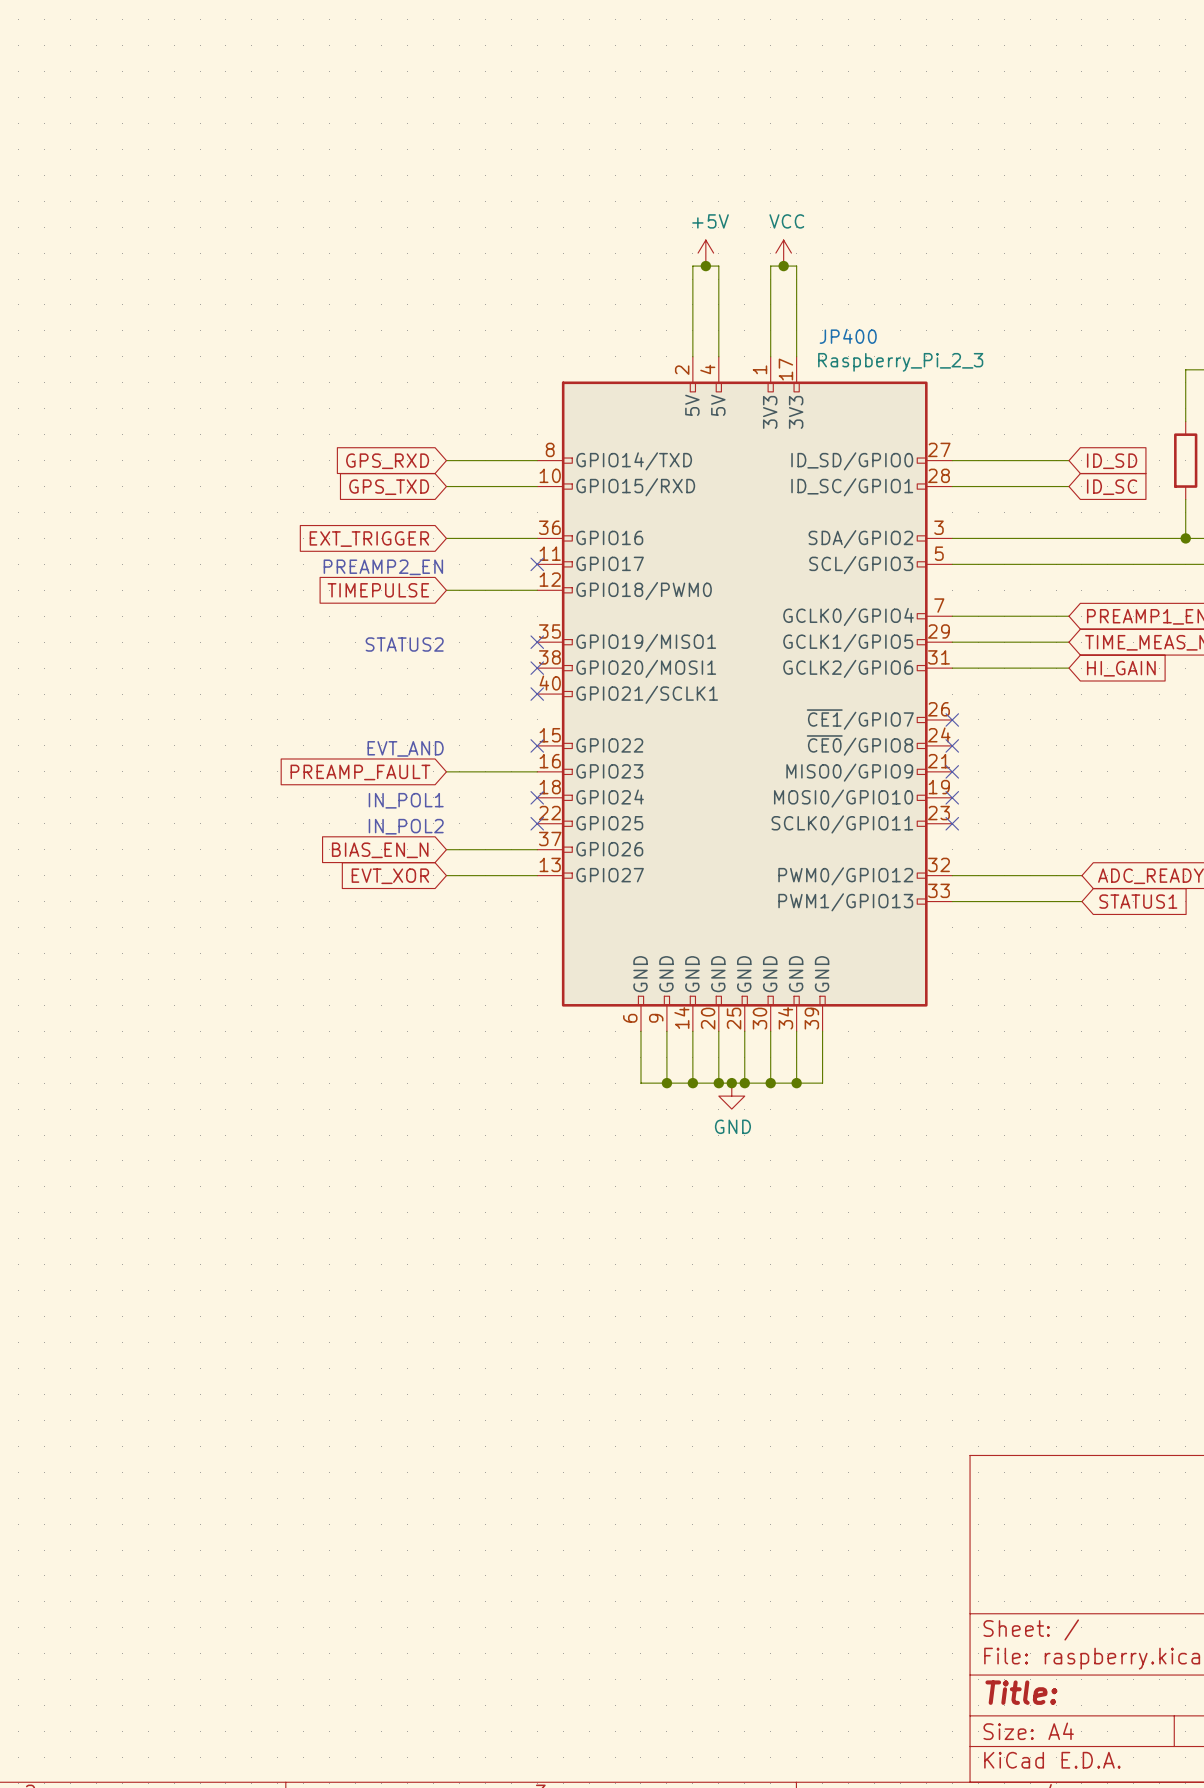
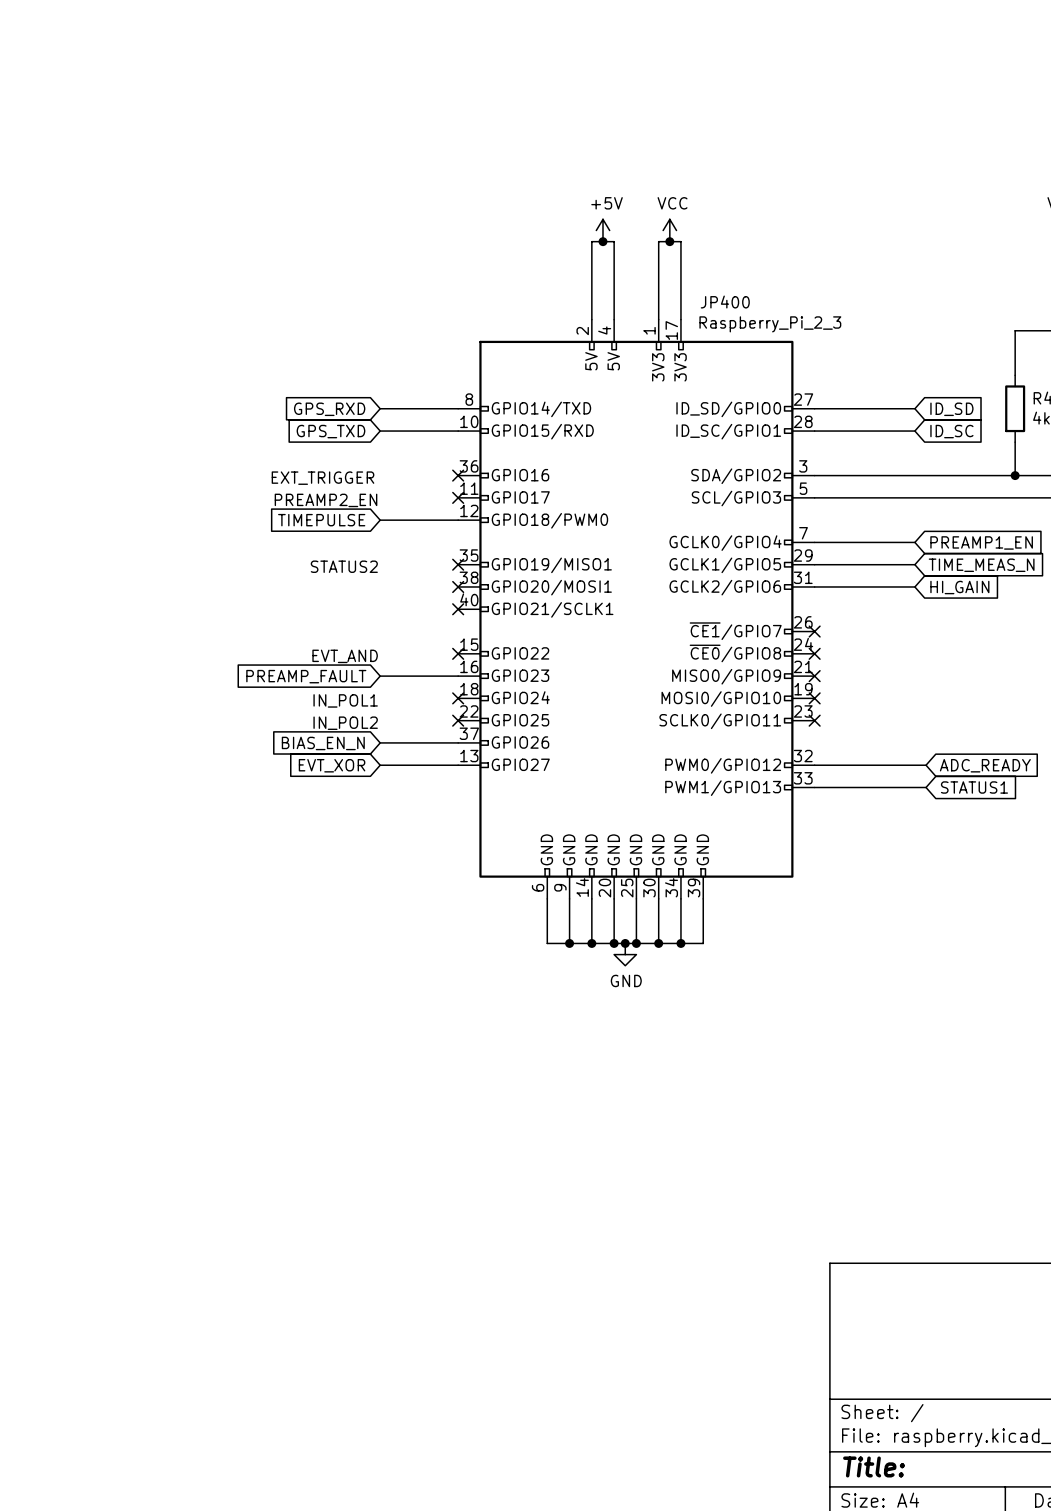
wire: (446, 538) (537, 538) -> none
no-connect mark: none -> (458, 475)
global label: EXT_TRIGGER (369, 539) -> none
text: none -> EXT_TRIGGER (322, 478)

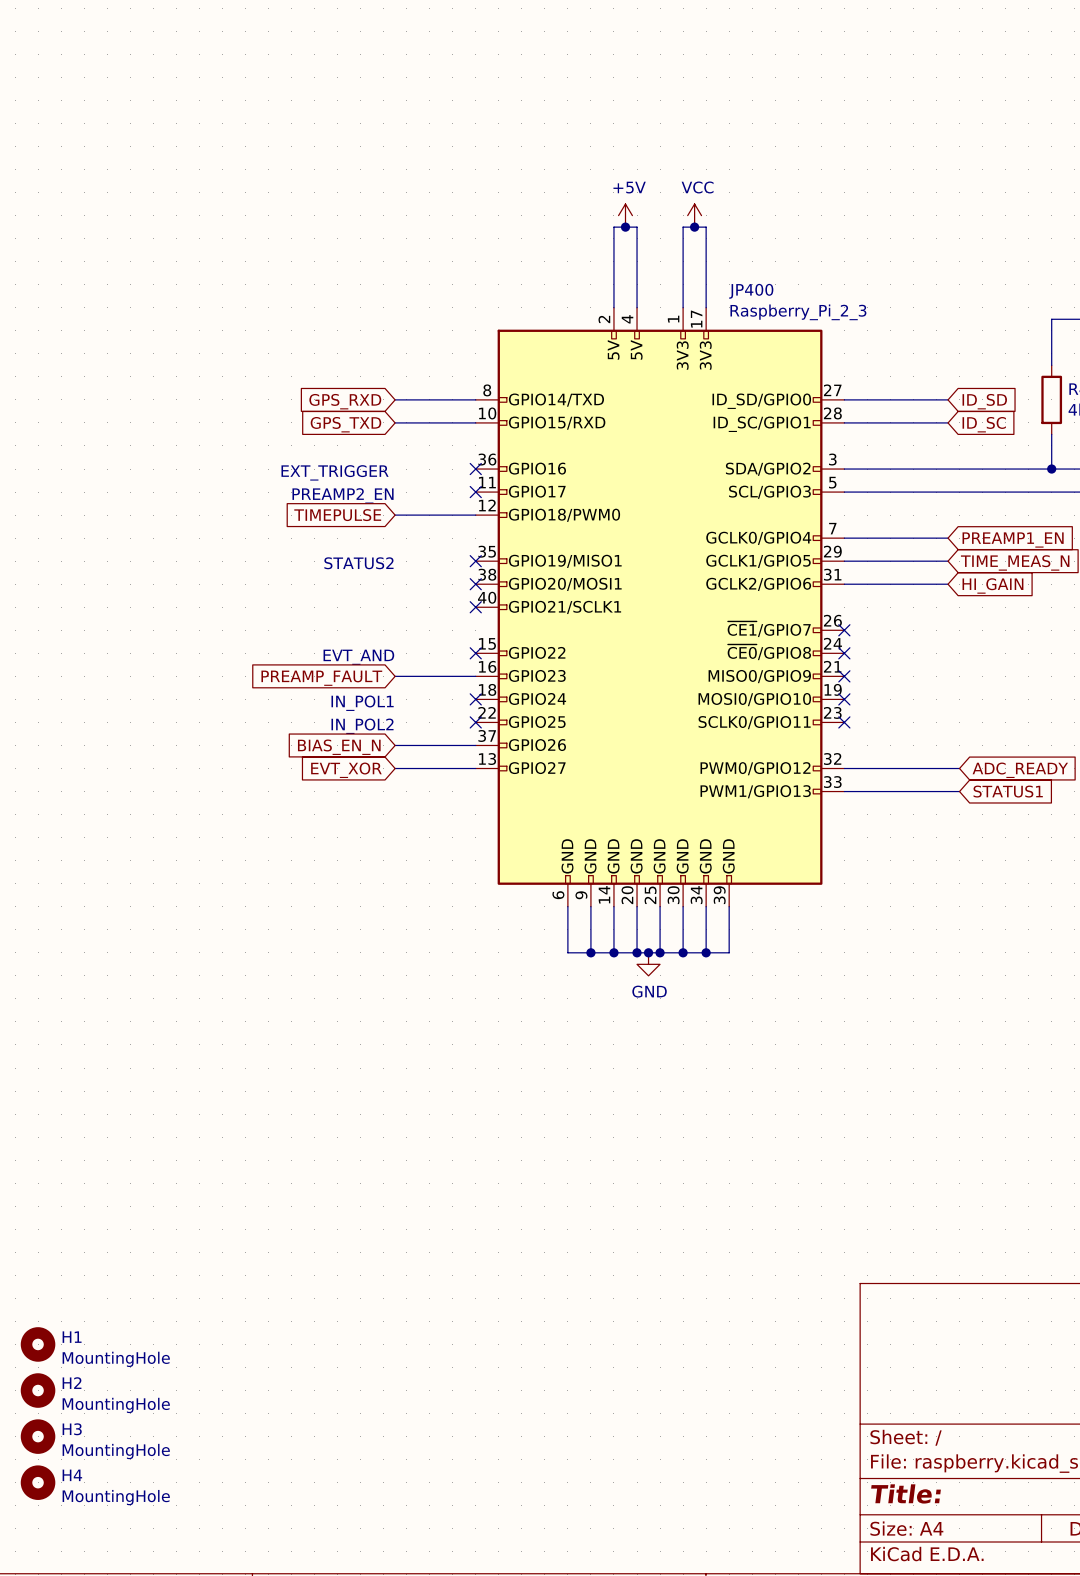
H1: none -> MountingHole (38, 1344)
H2: none -> MountingHole (38, 1390)
H3: none -> MountingHole (38, 1436)
H4: none -> MountingHole (38, 1482)

